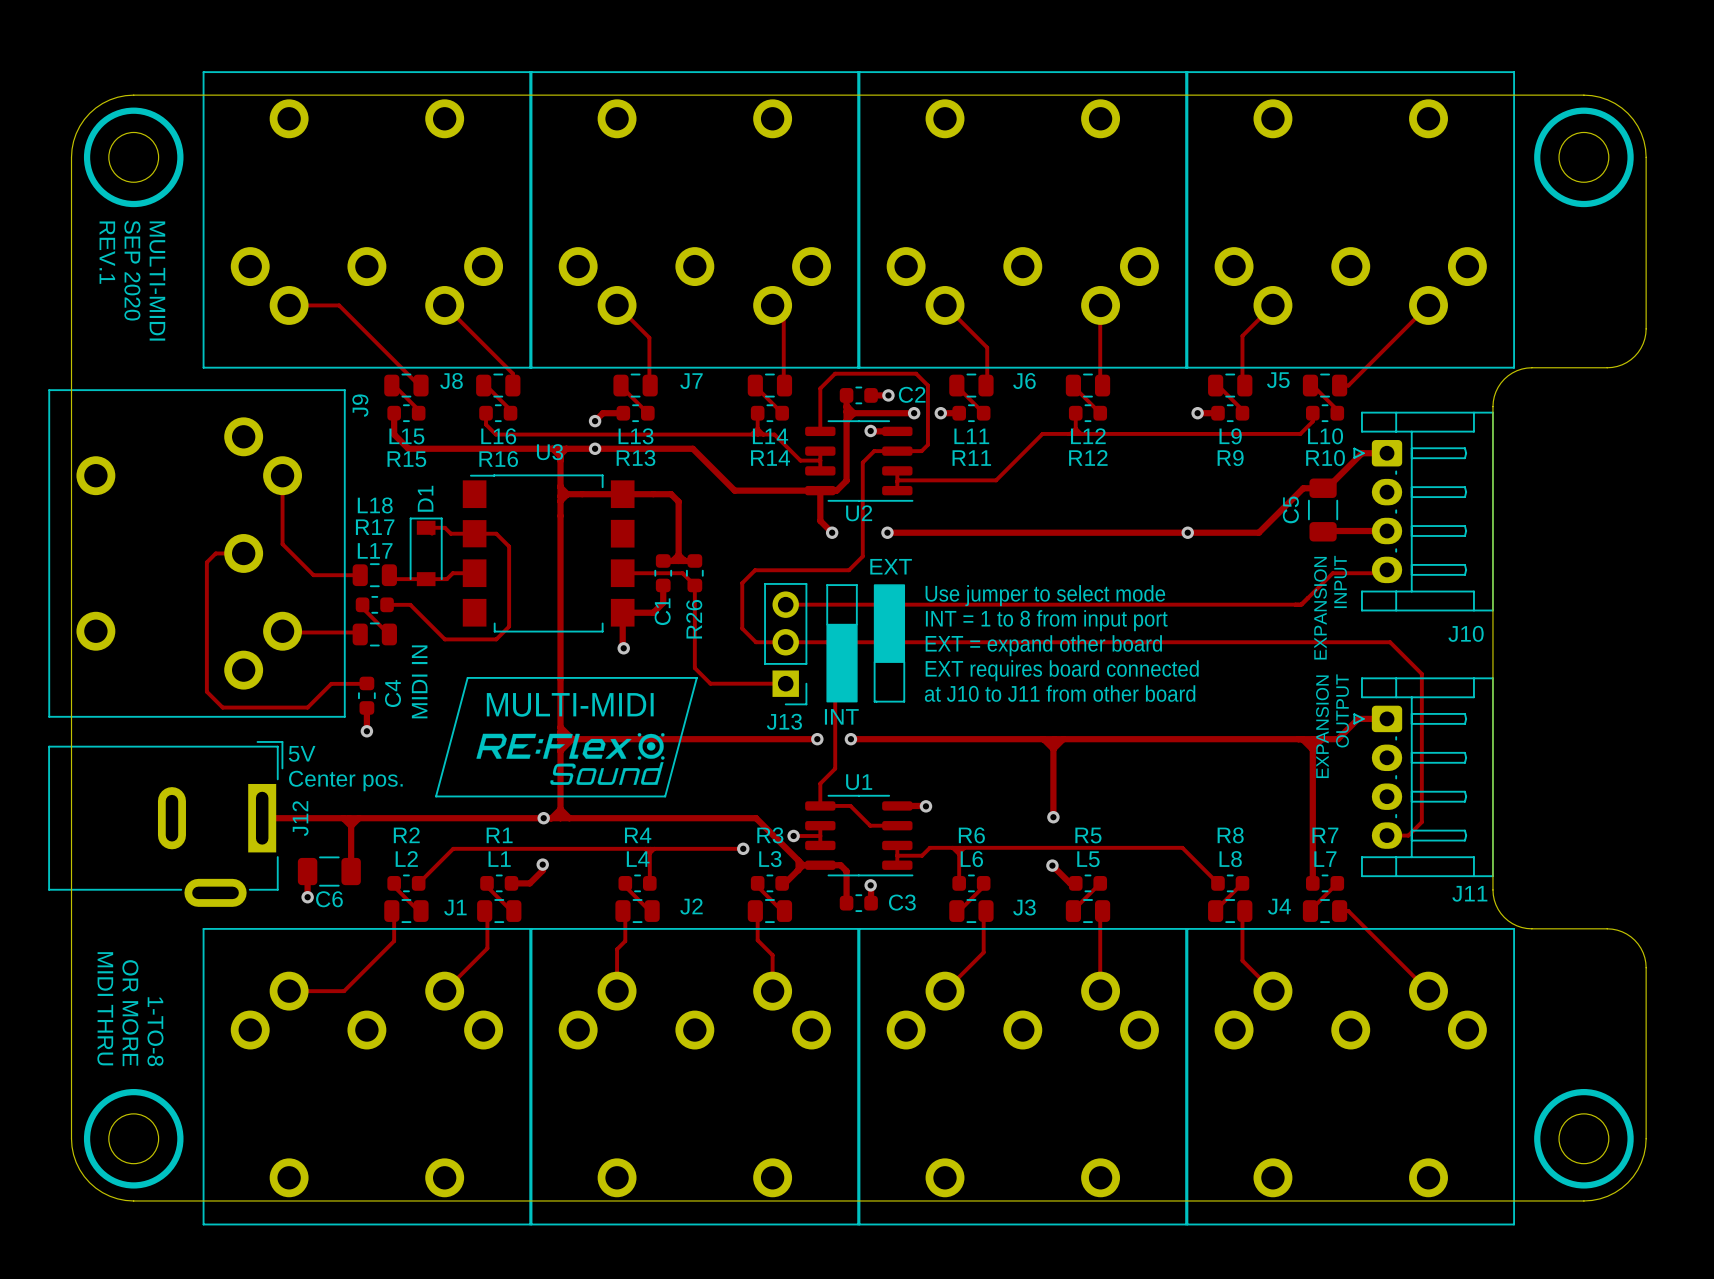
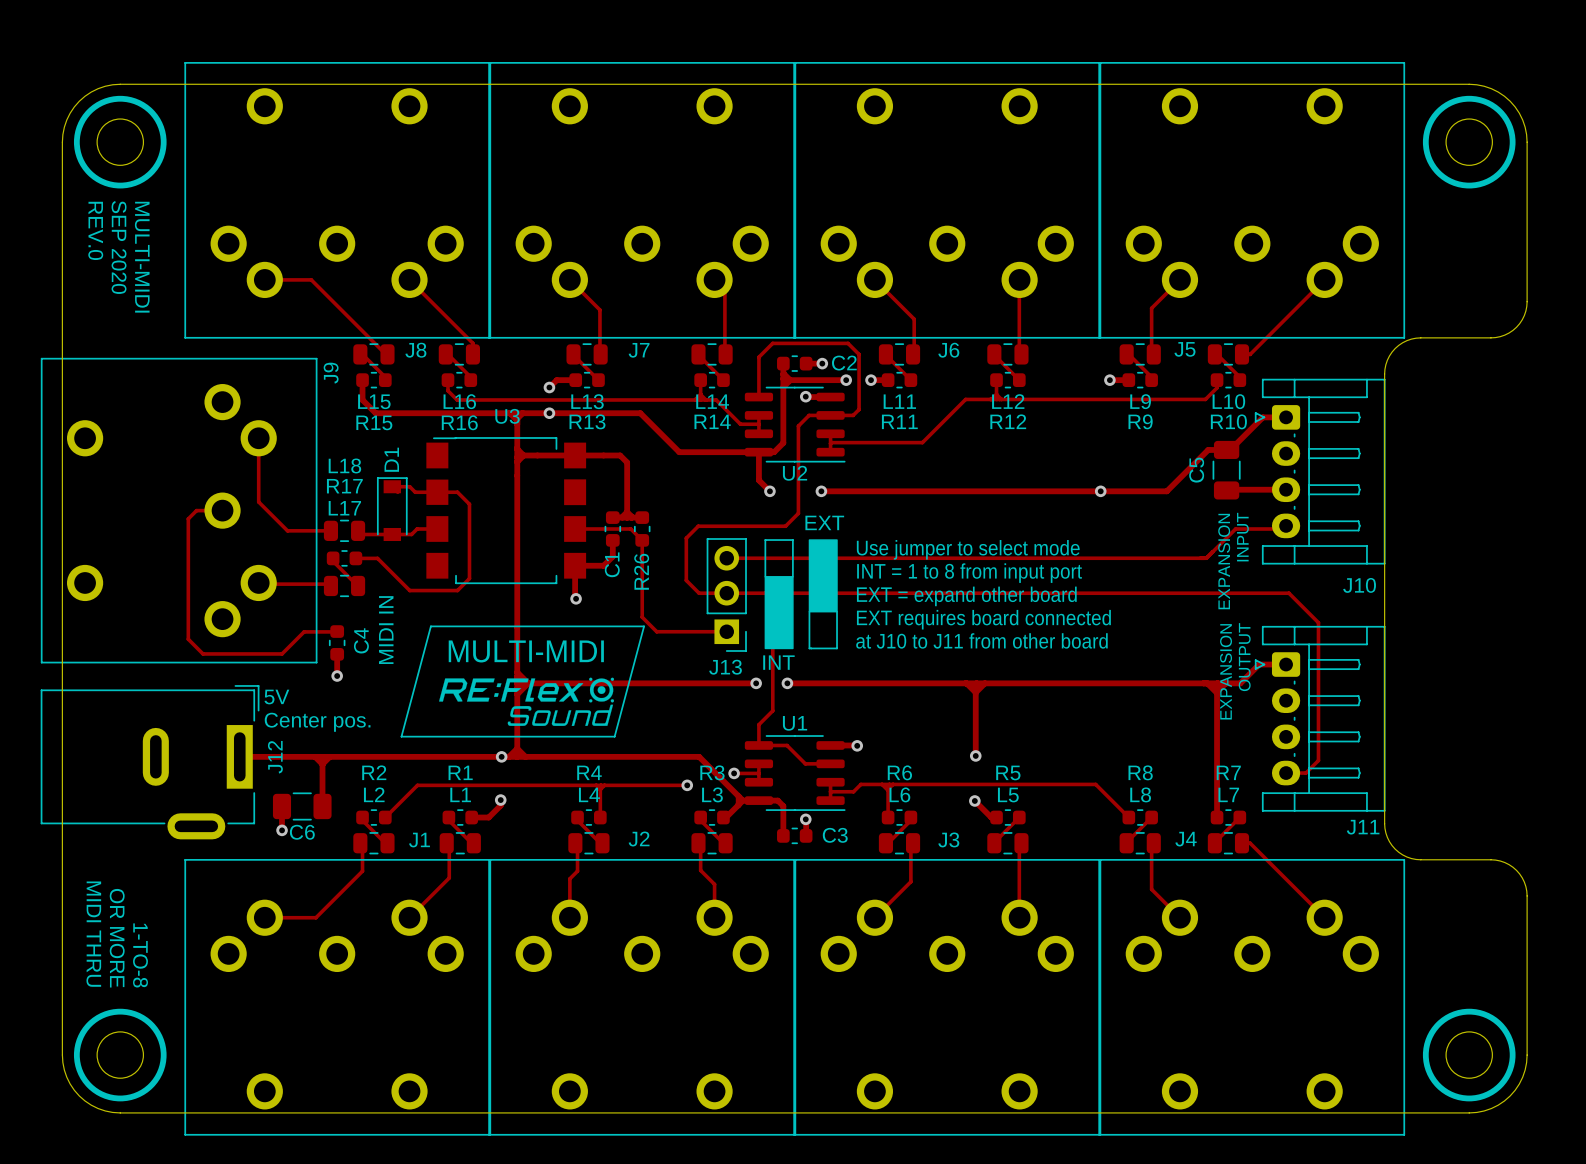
text: REV.1 (107, 252) -> REV.0 (95, 230)

